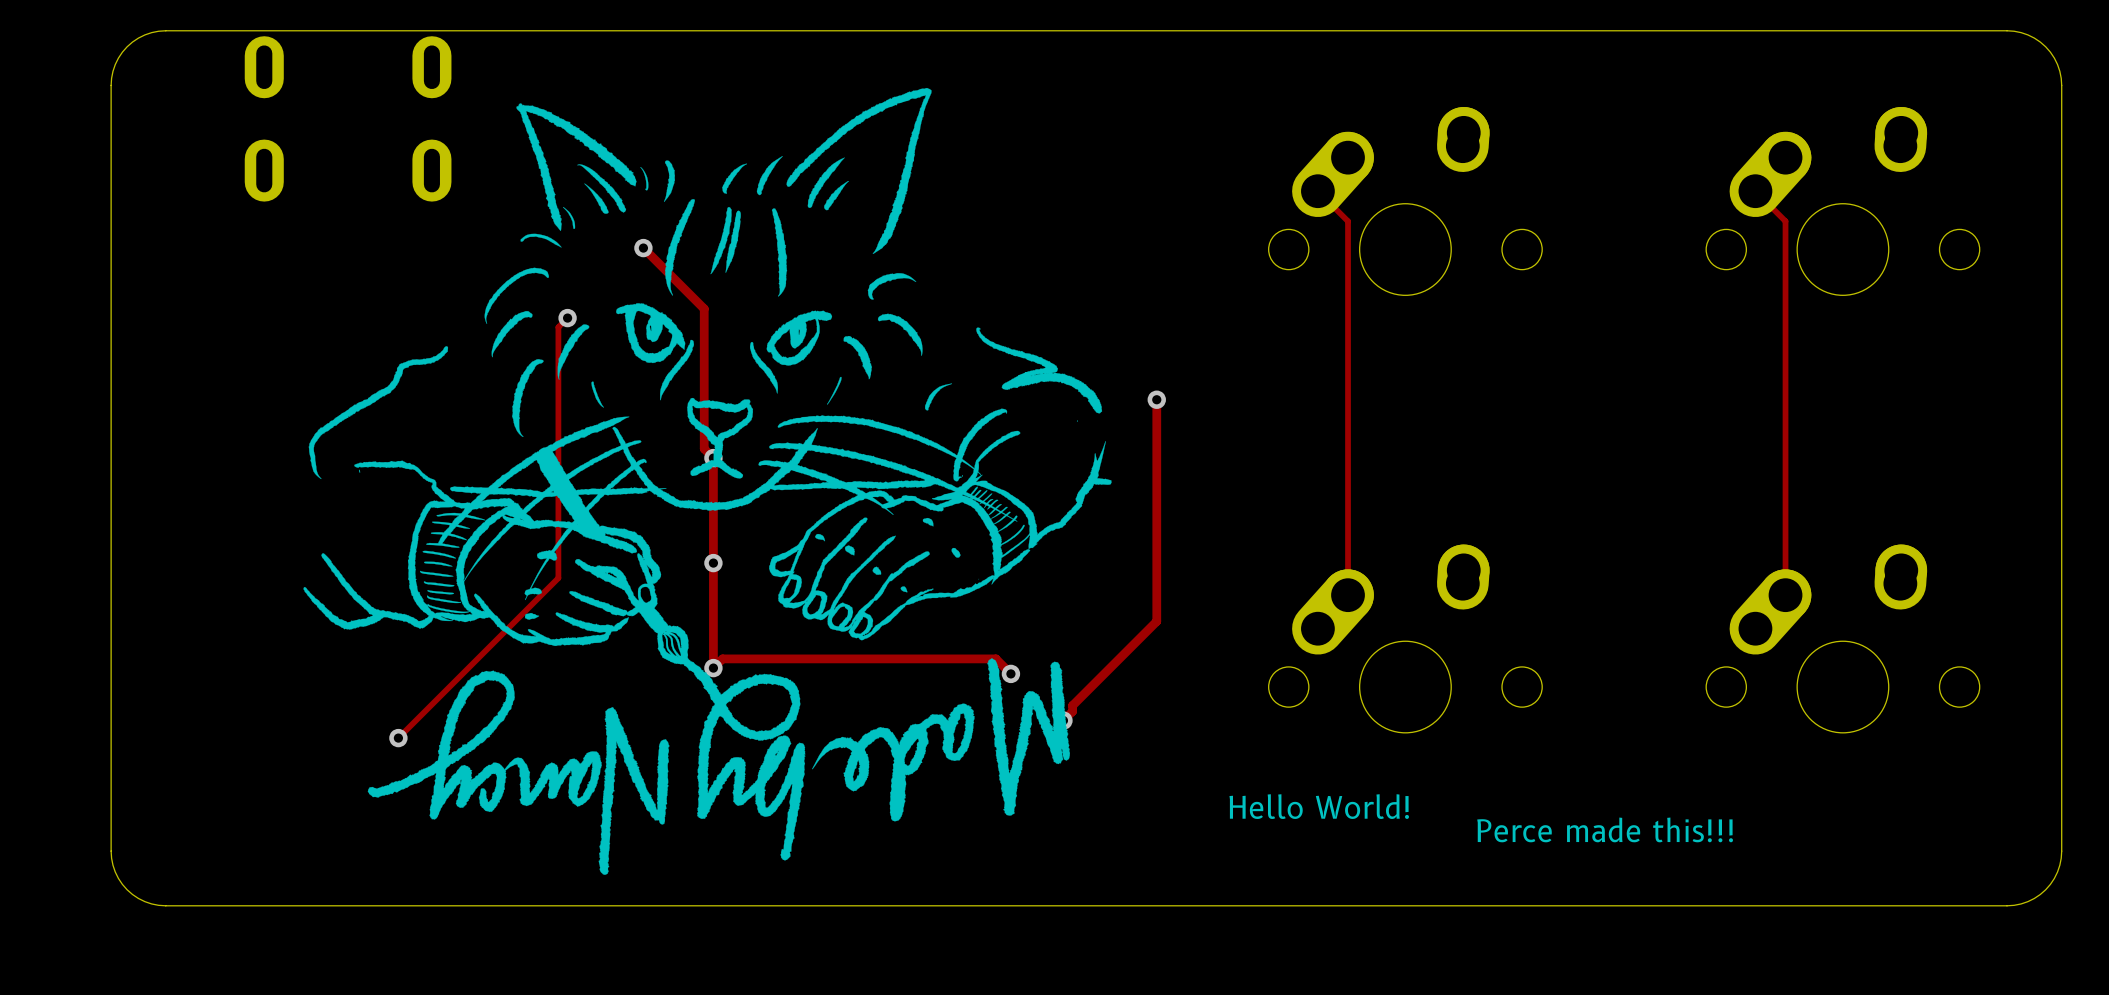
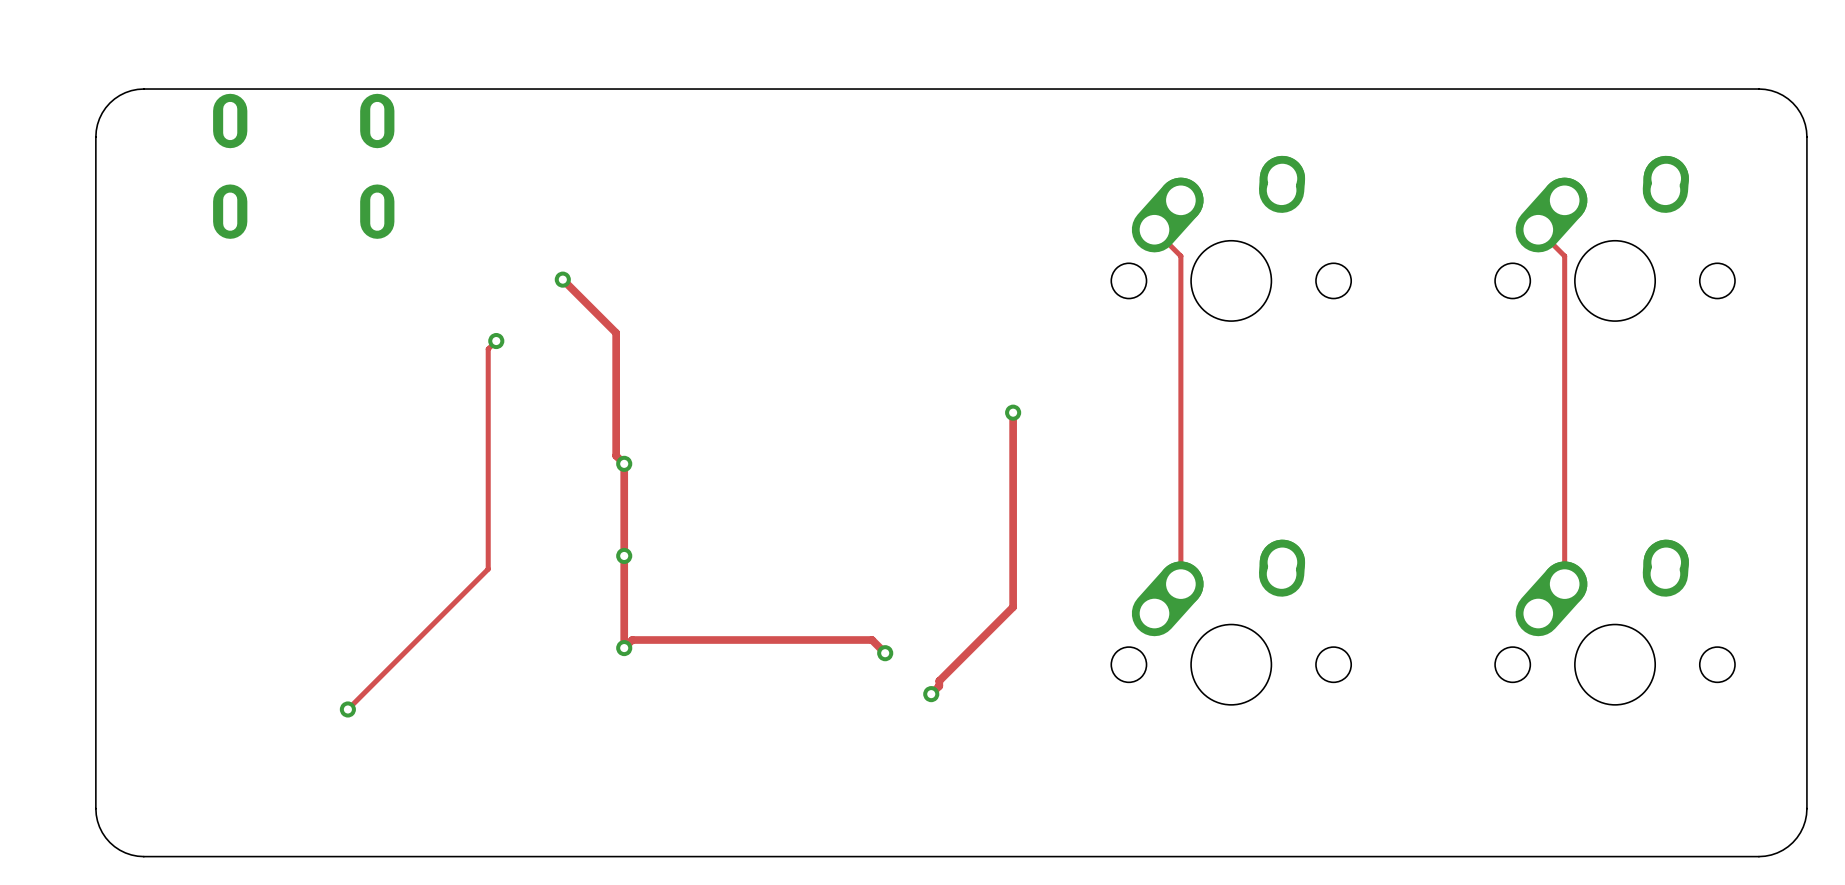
drawing: [303, 87, 1112, 875] -> none
text: Hello World! (1319, 806) -> none
text: Perce made this!!! (1605, 829) -> none

